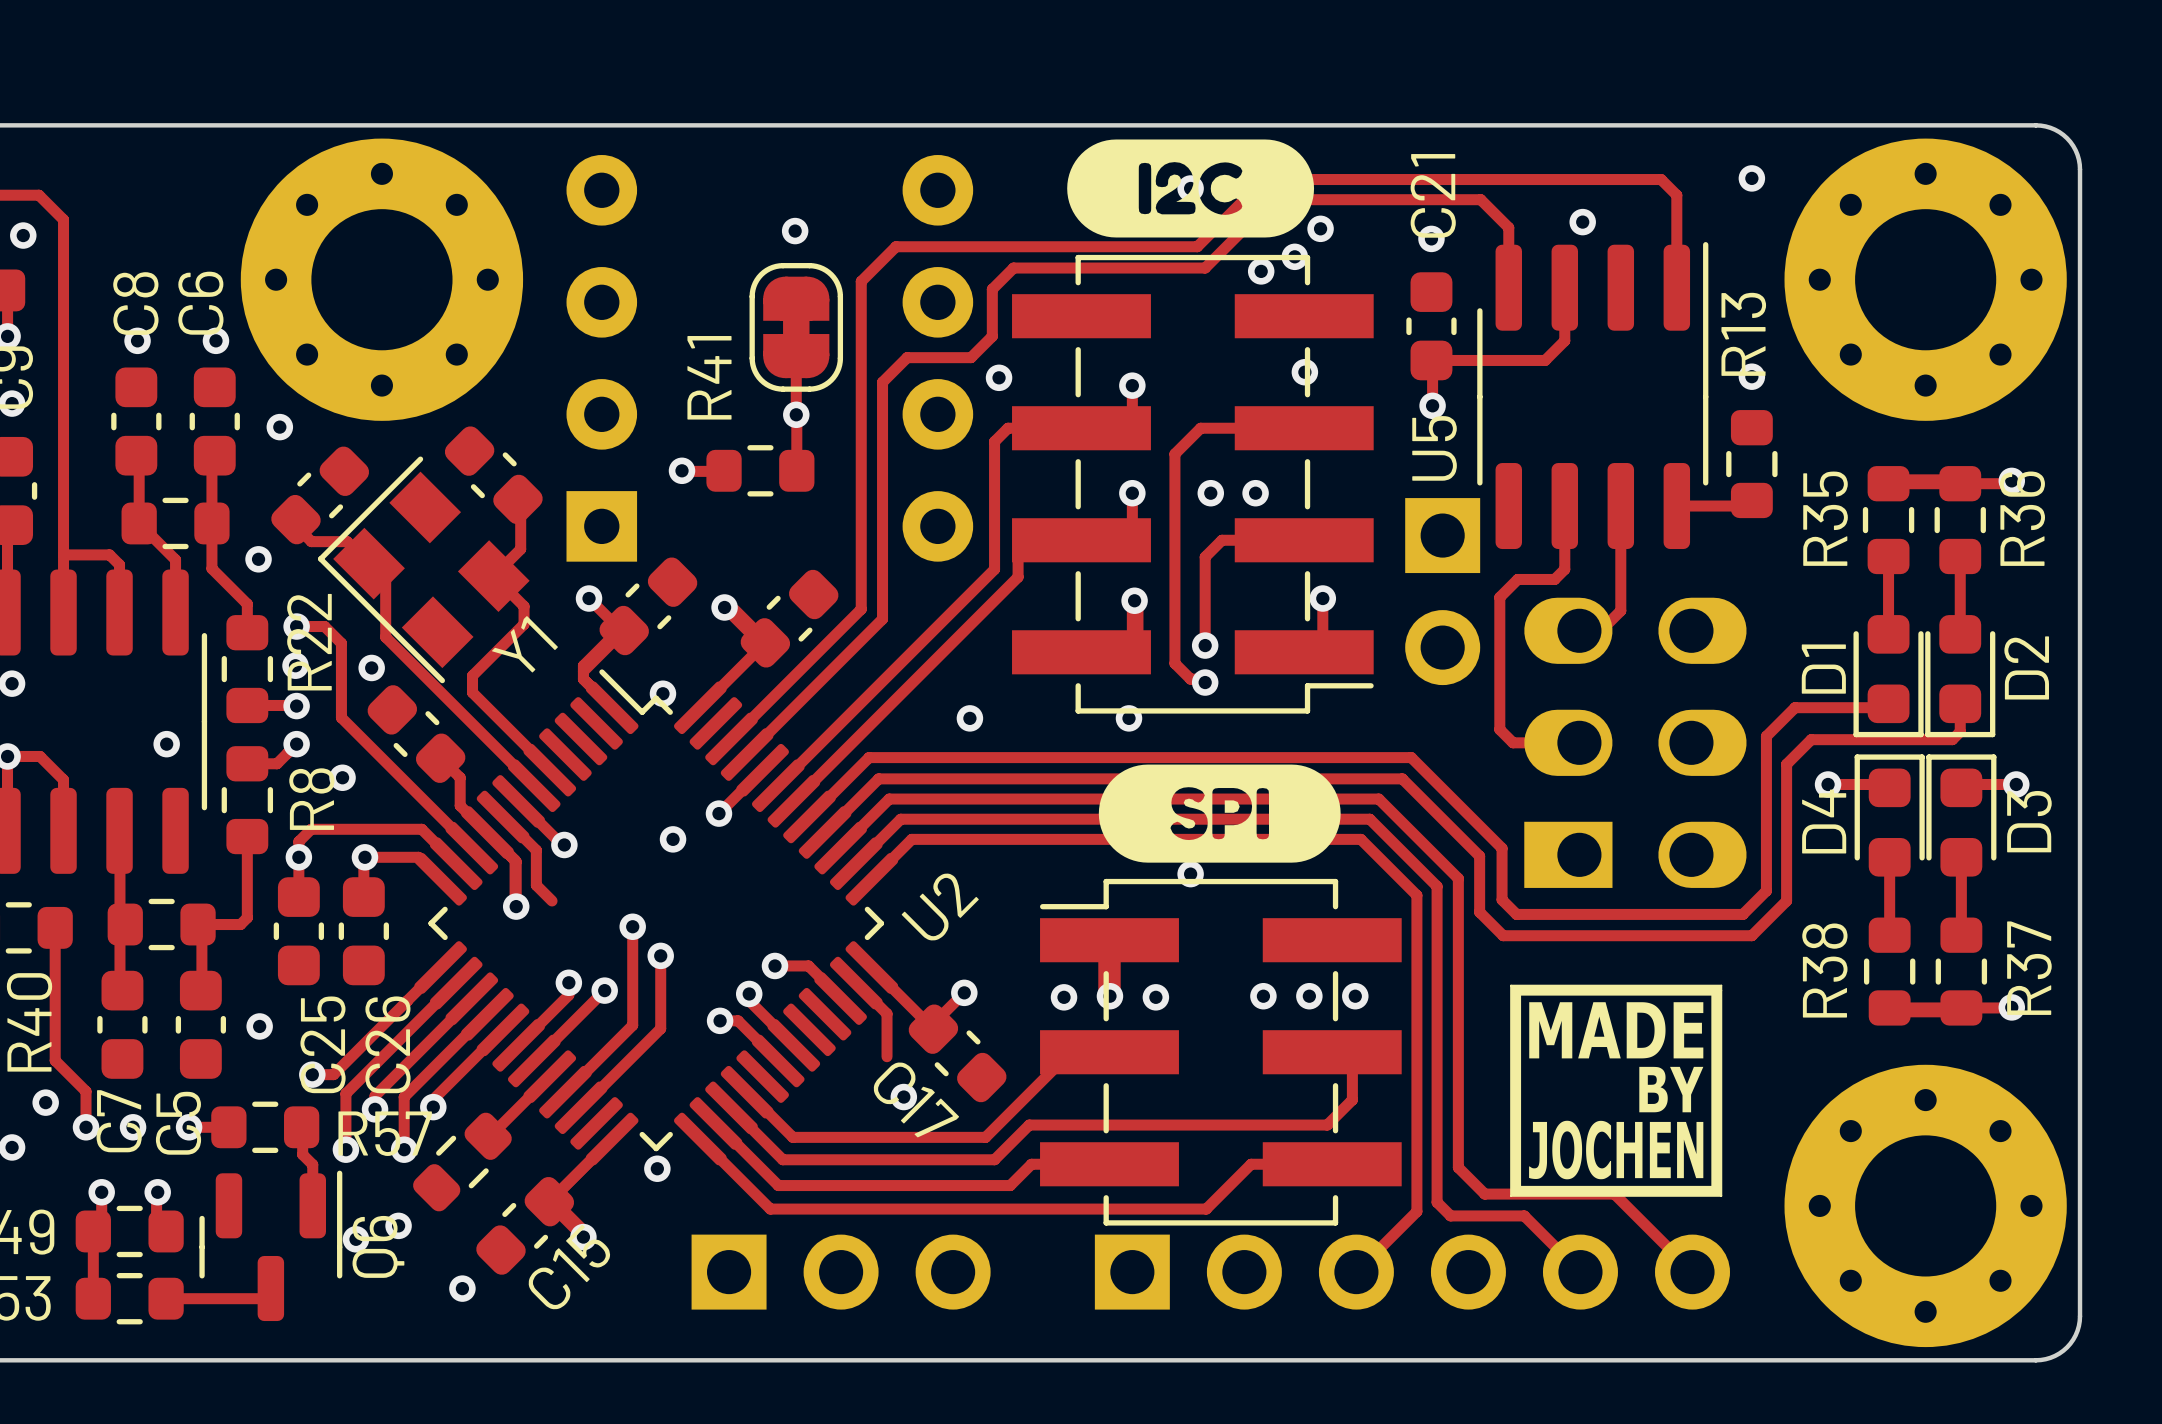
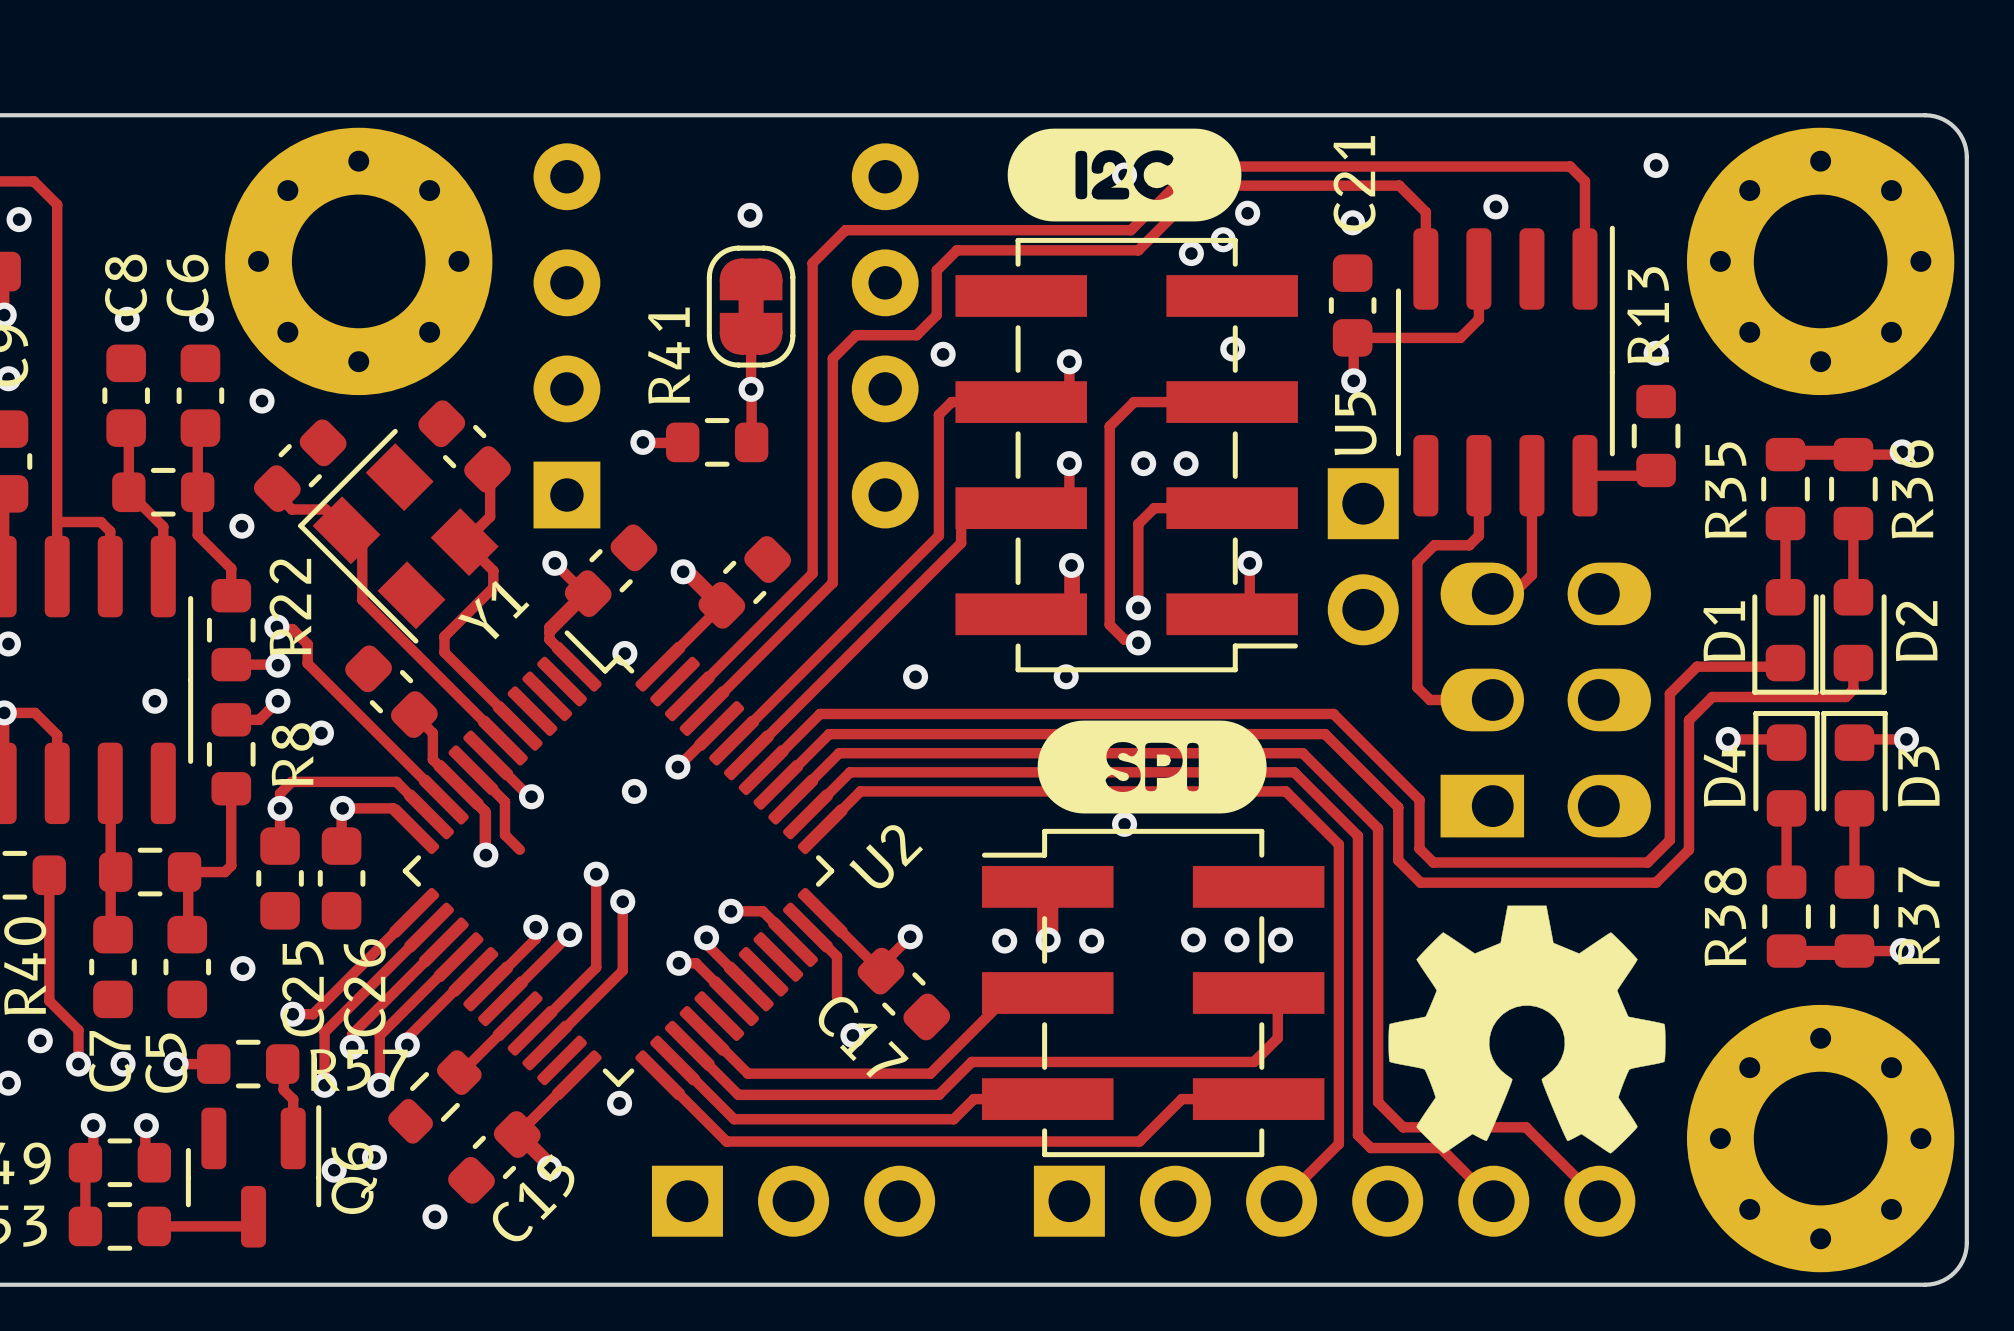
track: (296, 626) (324, 626) (341, 643) (341, 717) -> (277, 629) (292, 629) (307, 644) (307, 663) (320, 676)
via: (296, 626) -> none
via: (371, 667) -> none
drawing shape: [1510, 984, 1723, 1197] -> [1388, 905, 1666, 1154]

